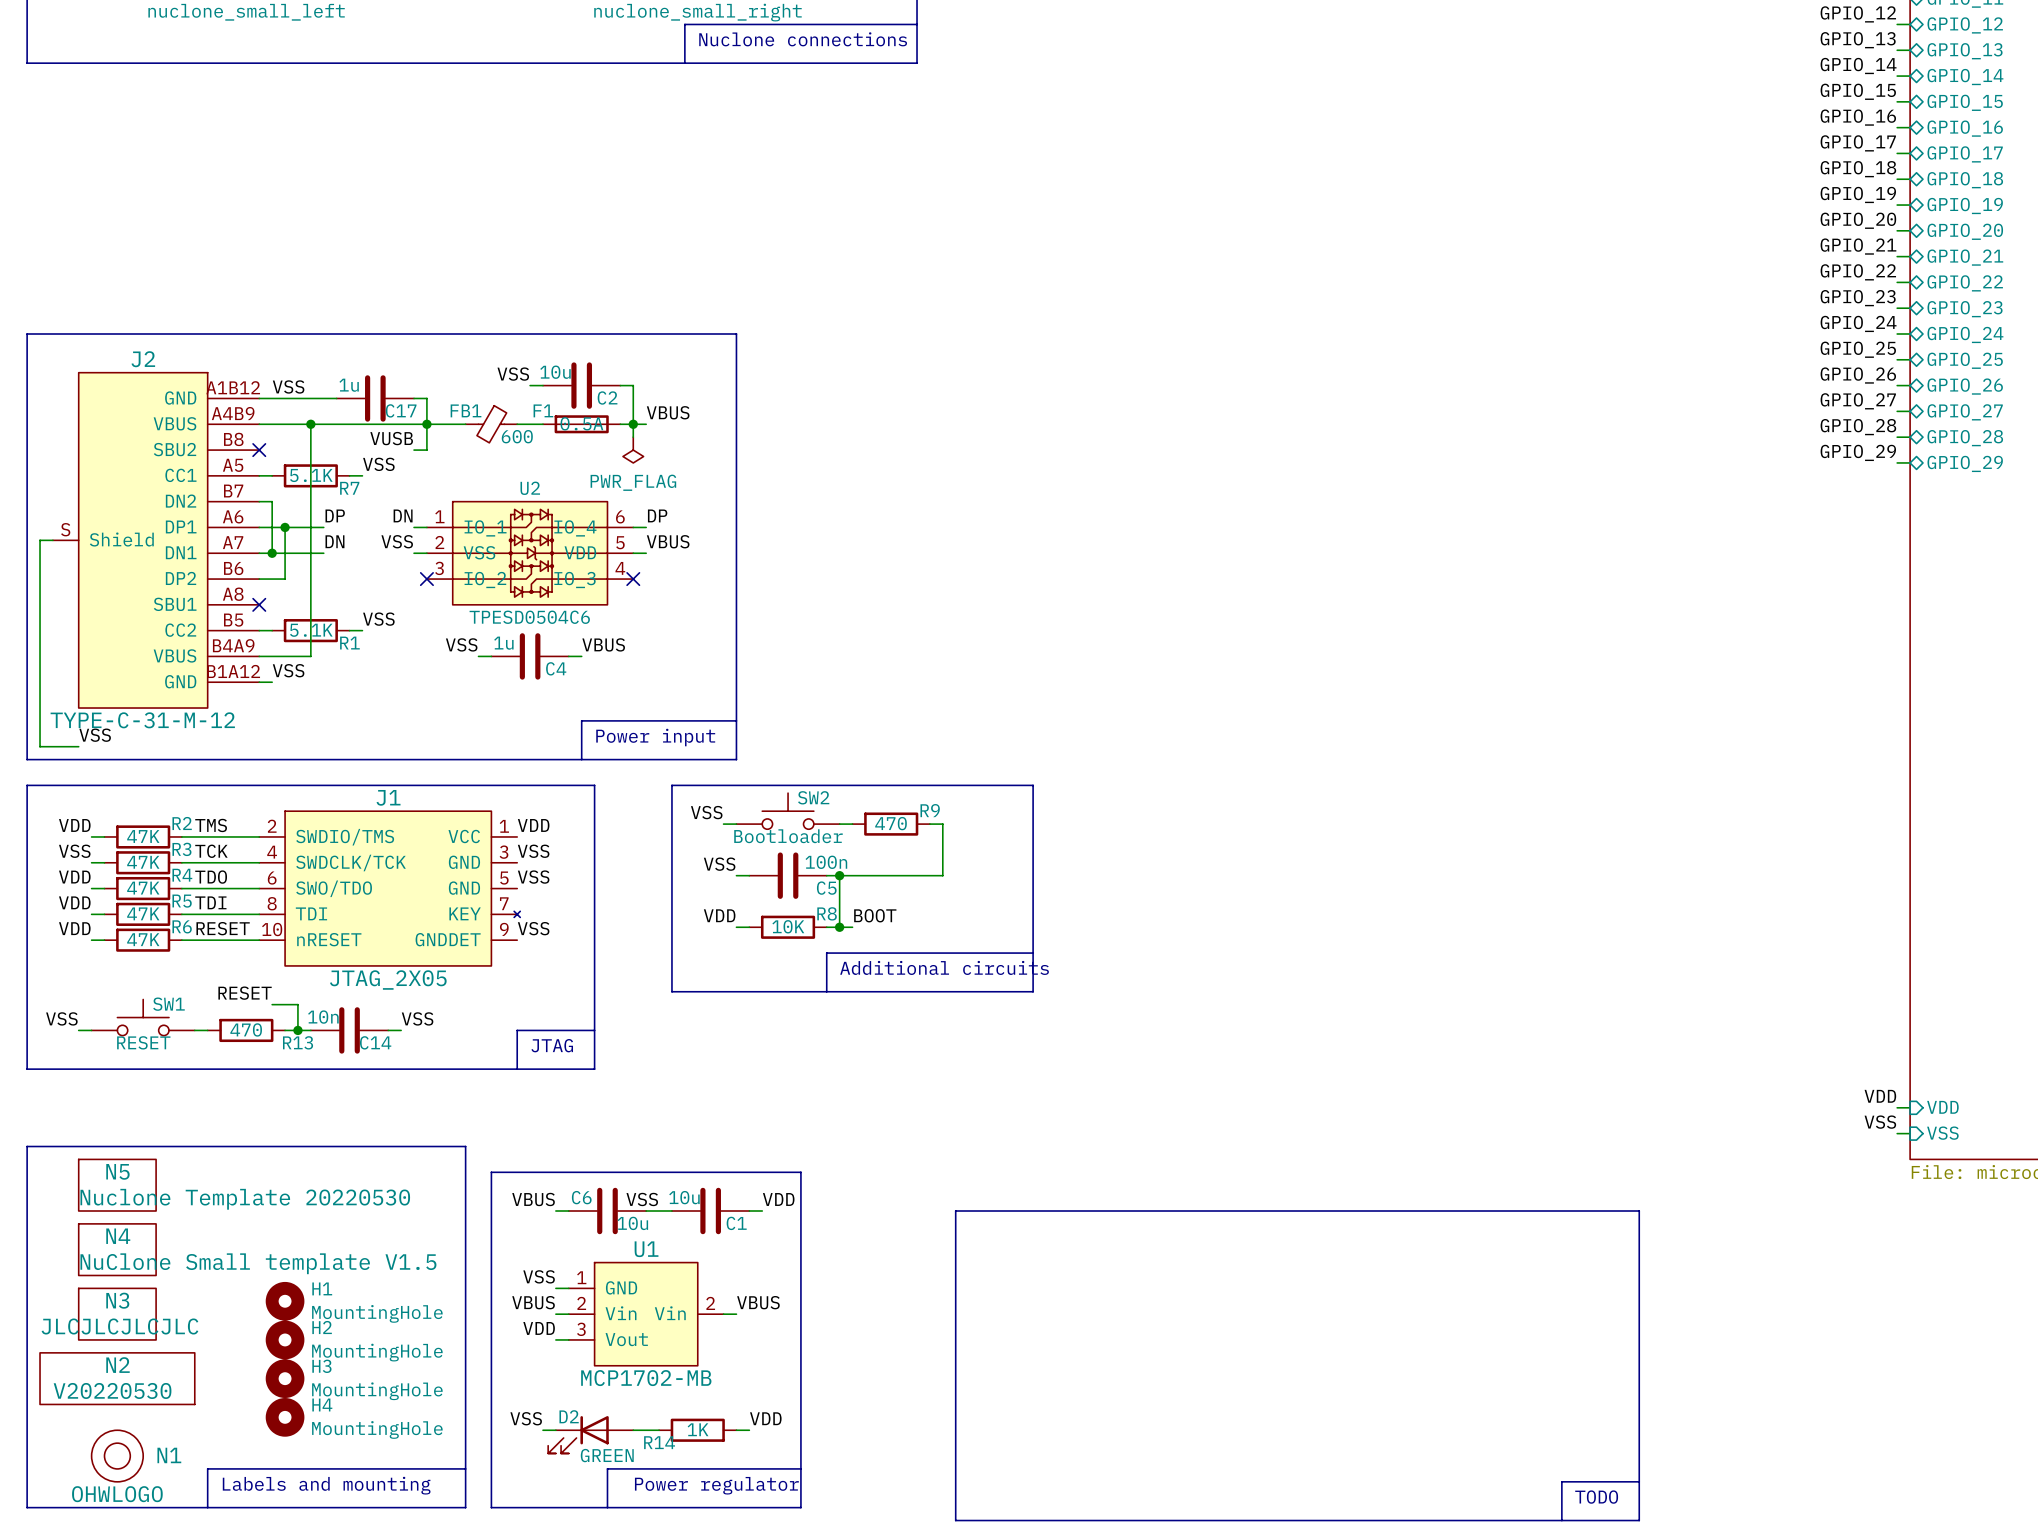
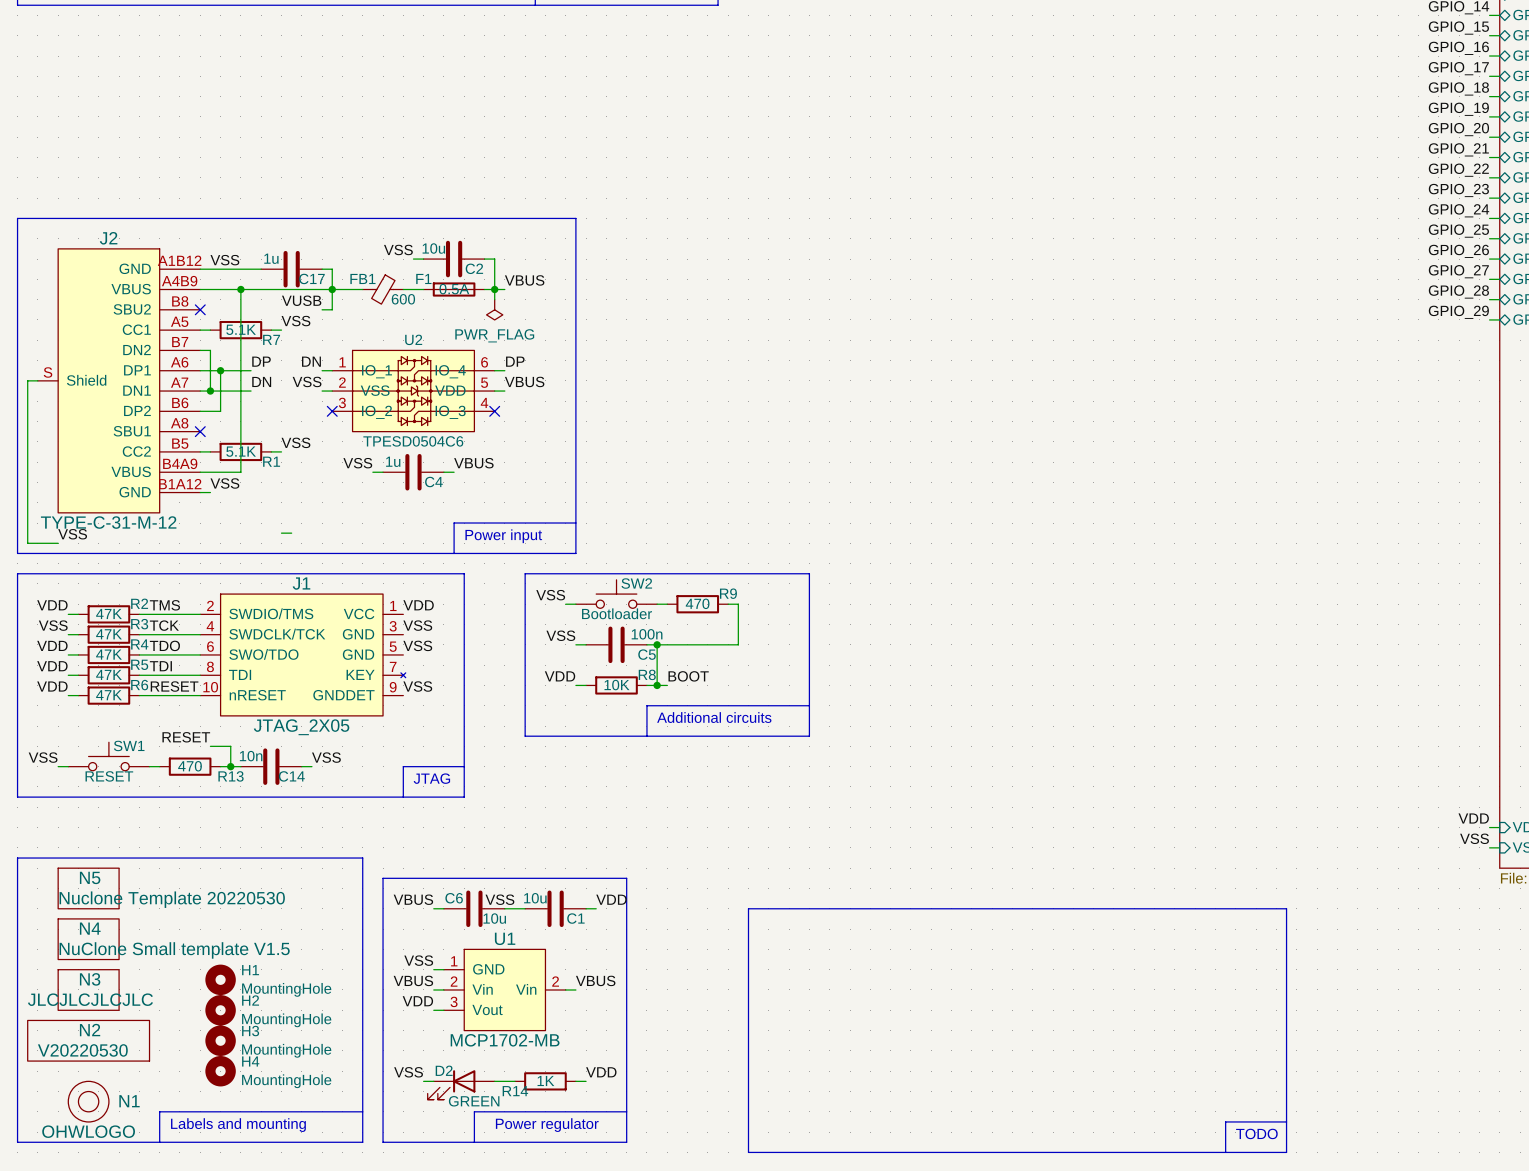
wire: none -> (281, 533) (291, 533)

